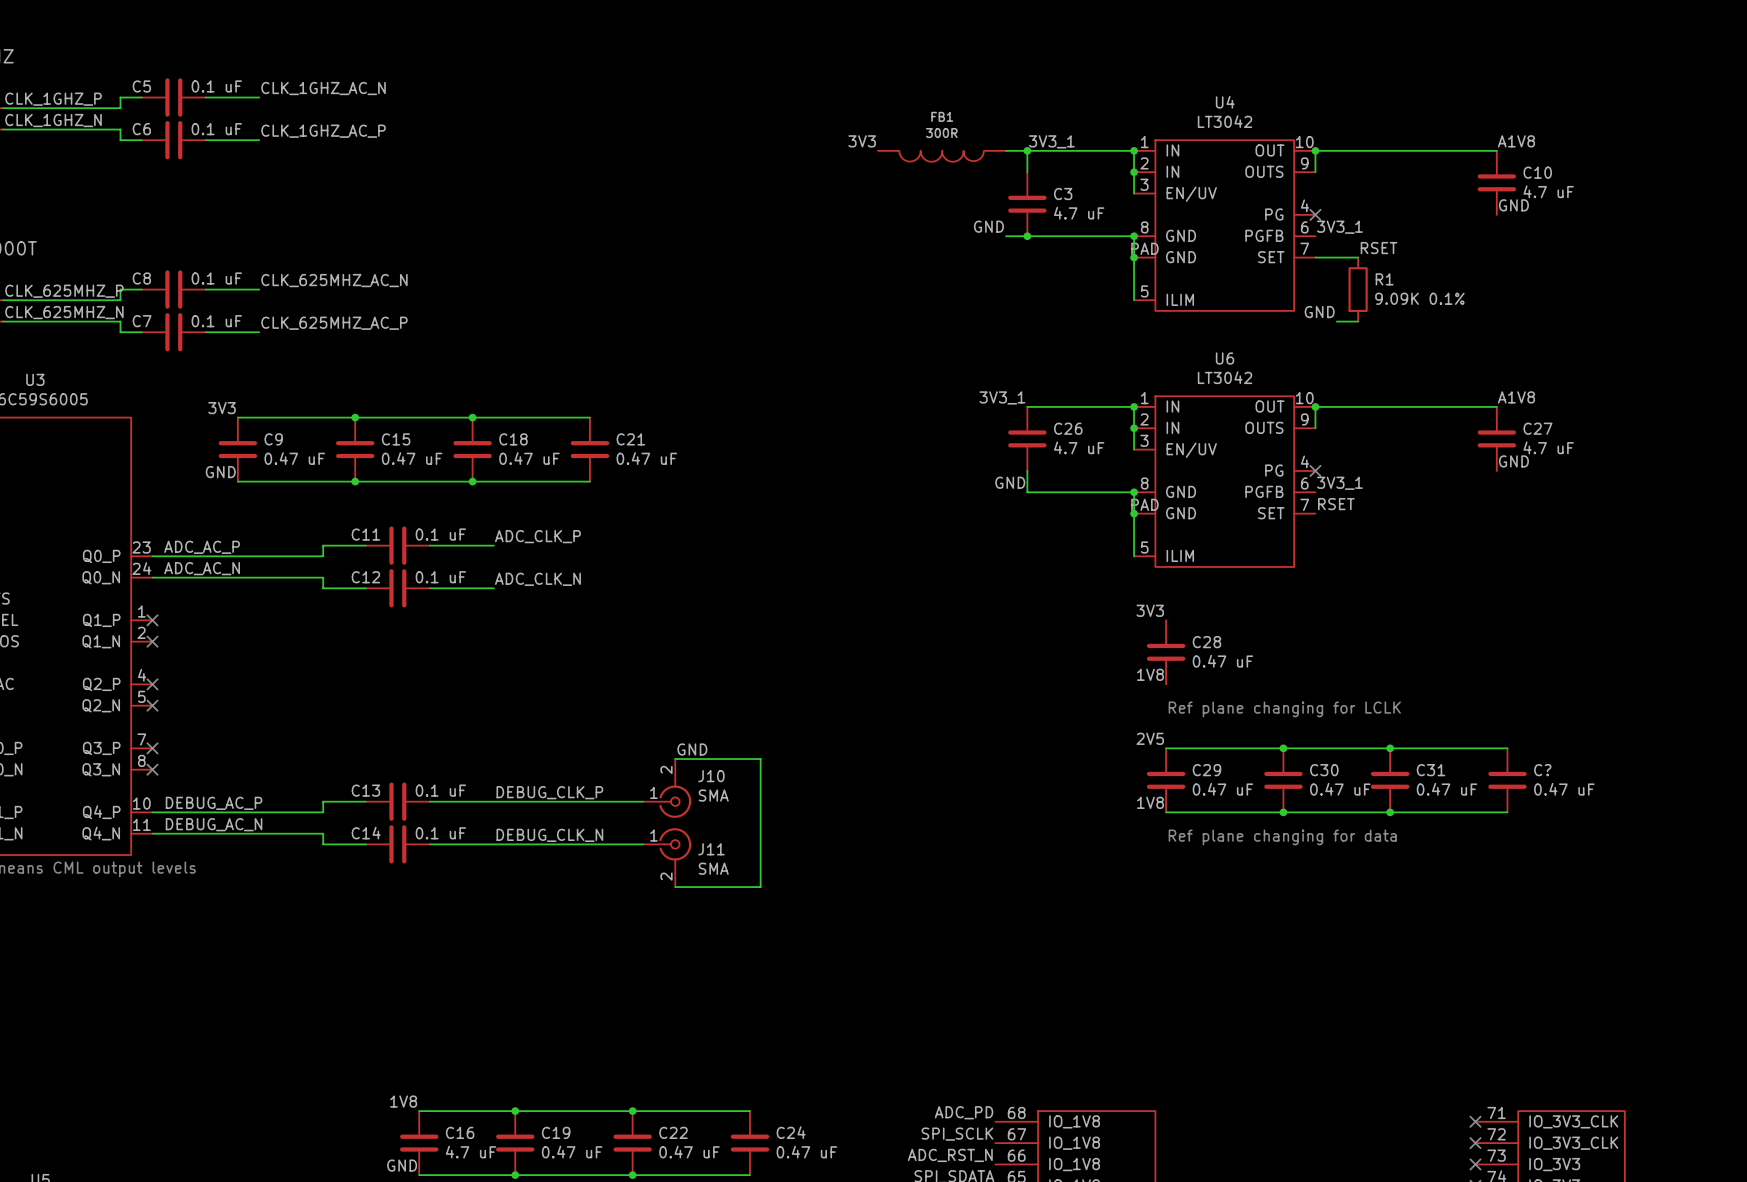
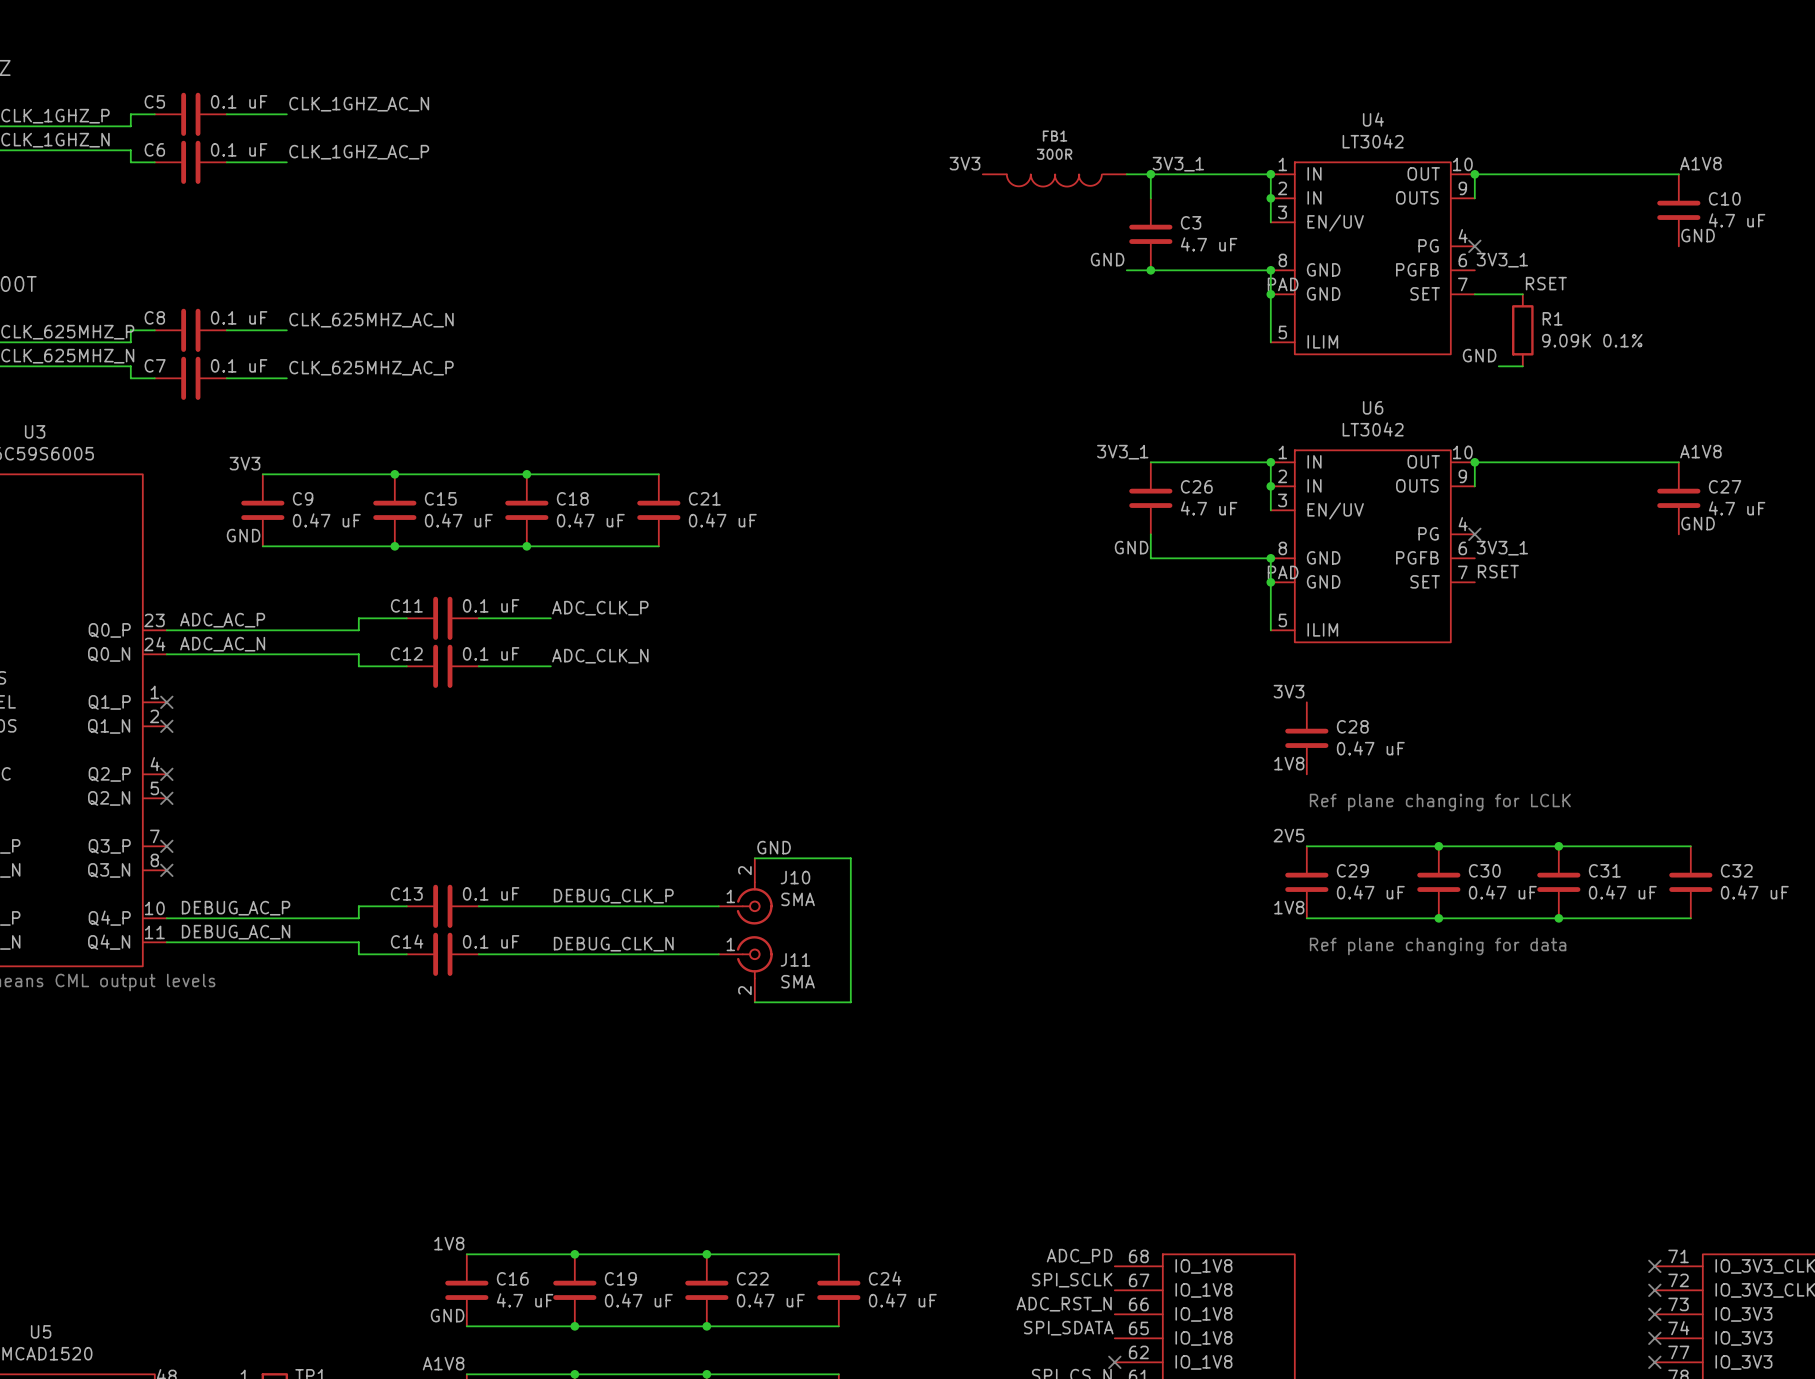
C? name: C? (1542, 770) -> C32 (1736, 870)

